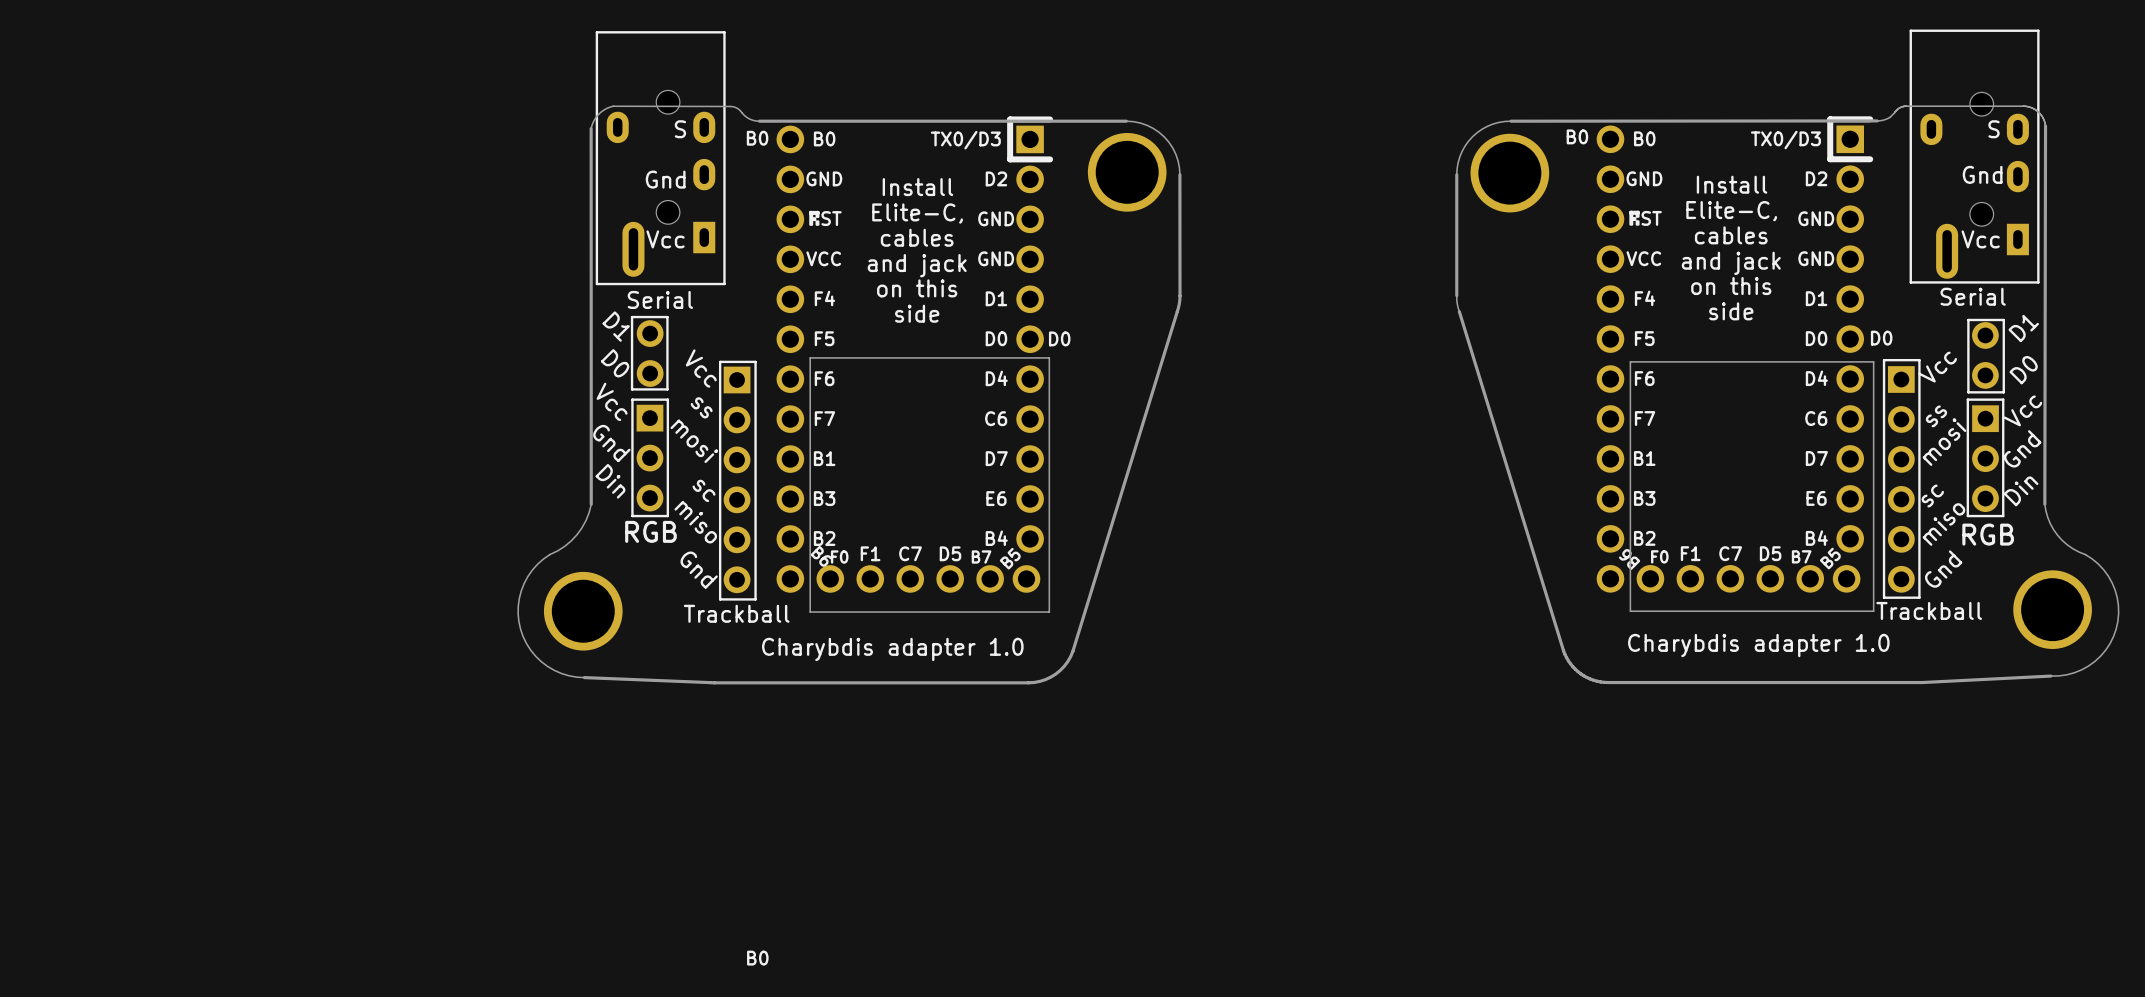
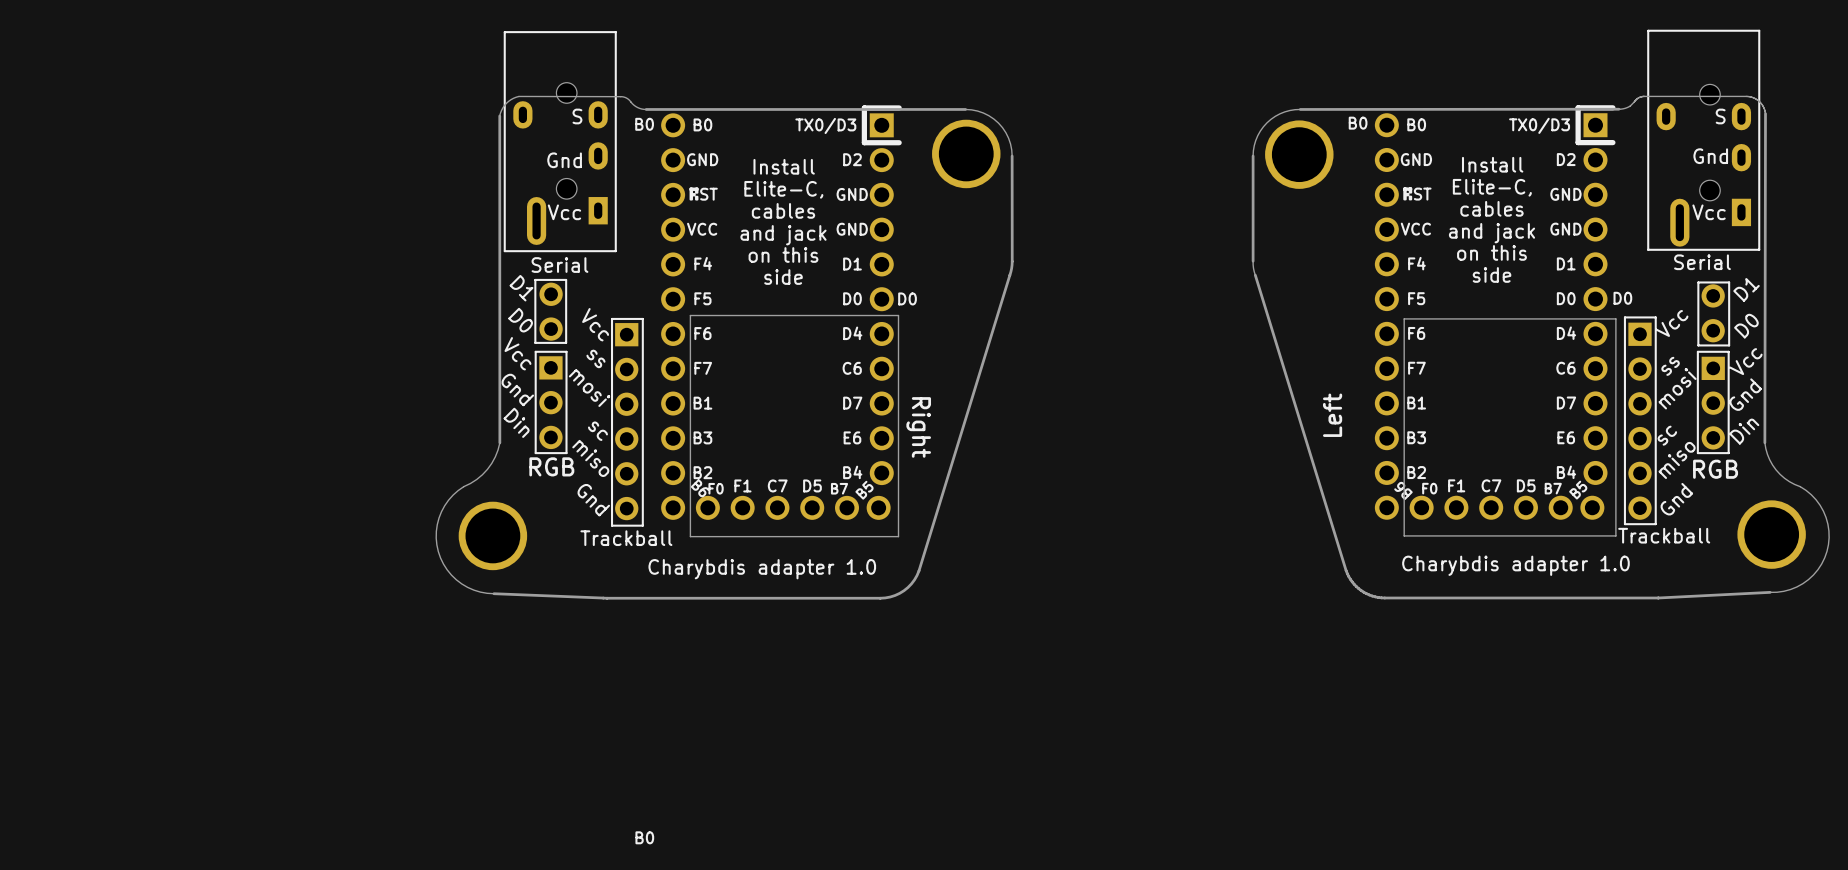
text: none -> Left (1332, 415)
text: none -> Right (918, 427)

